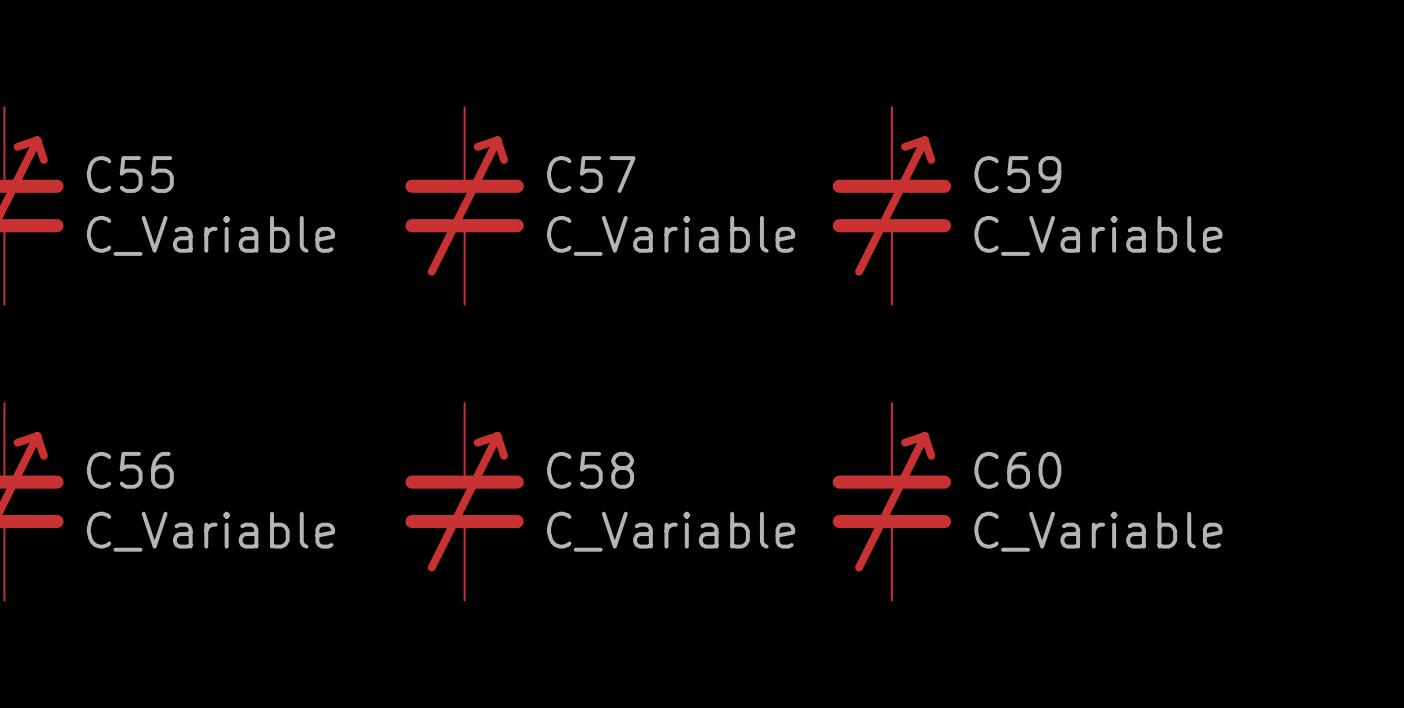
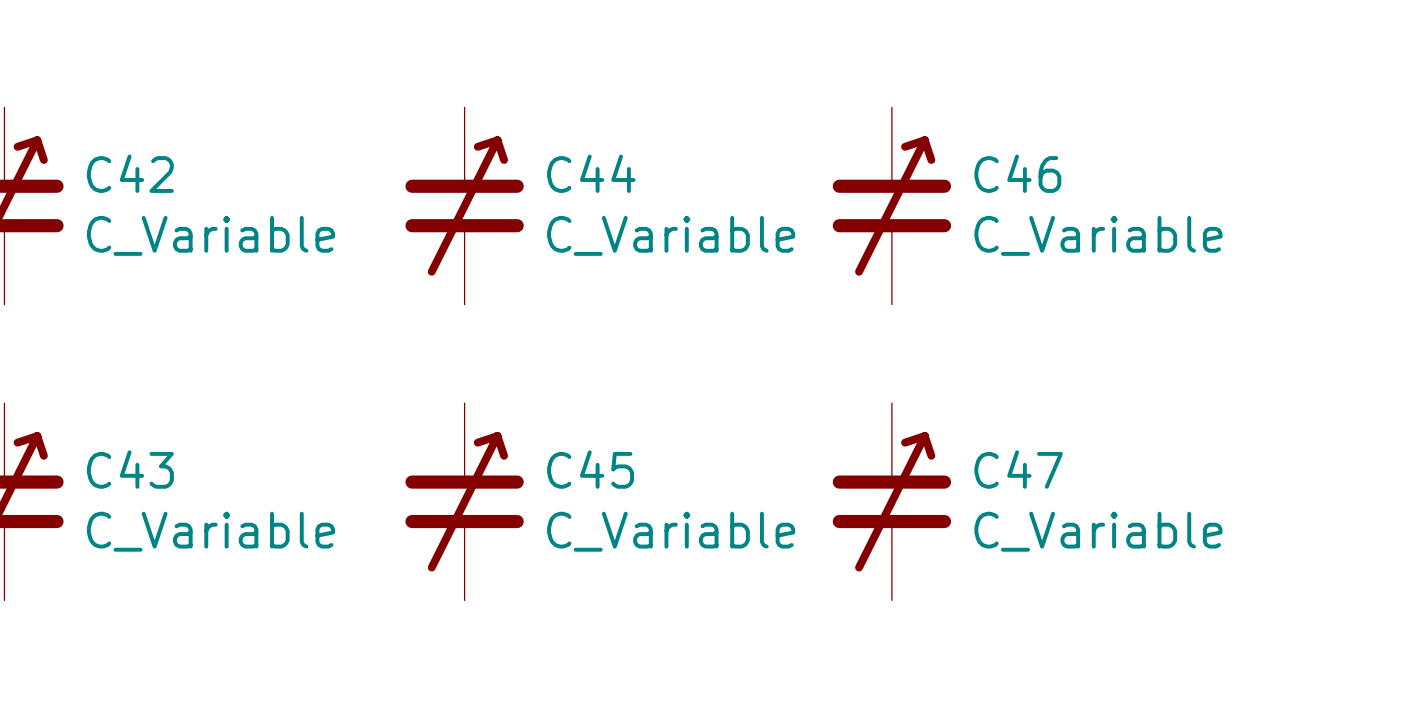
C55 name: C55 (130, 174) -> C42 (130, 173)
C57 name: C57 (591, 174) -> C44 (591, 173)
C59 name: C59 (1017, 174) -> C46 (1017, 173)
C56 name: C56 (130, 470) -> C43 (130, 469)
C58 name: C58 (590, 470) -> C45 (590, 469)
C60 name: C60 (1017, 470) -> C47 (1018, 469)

